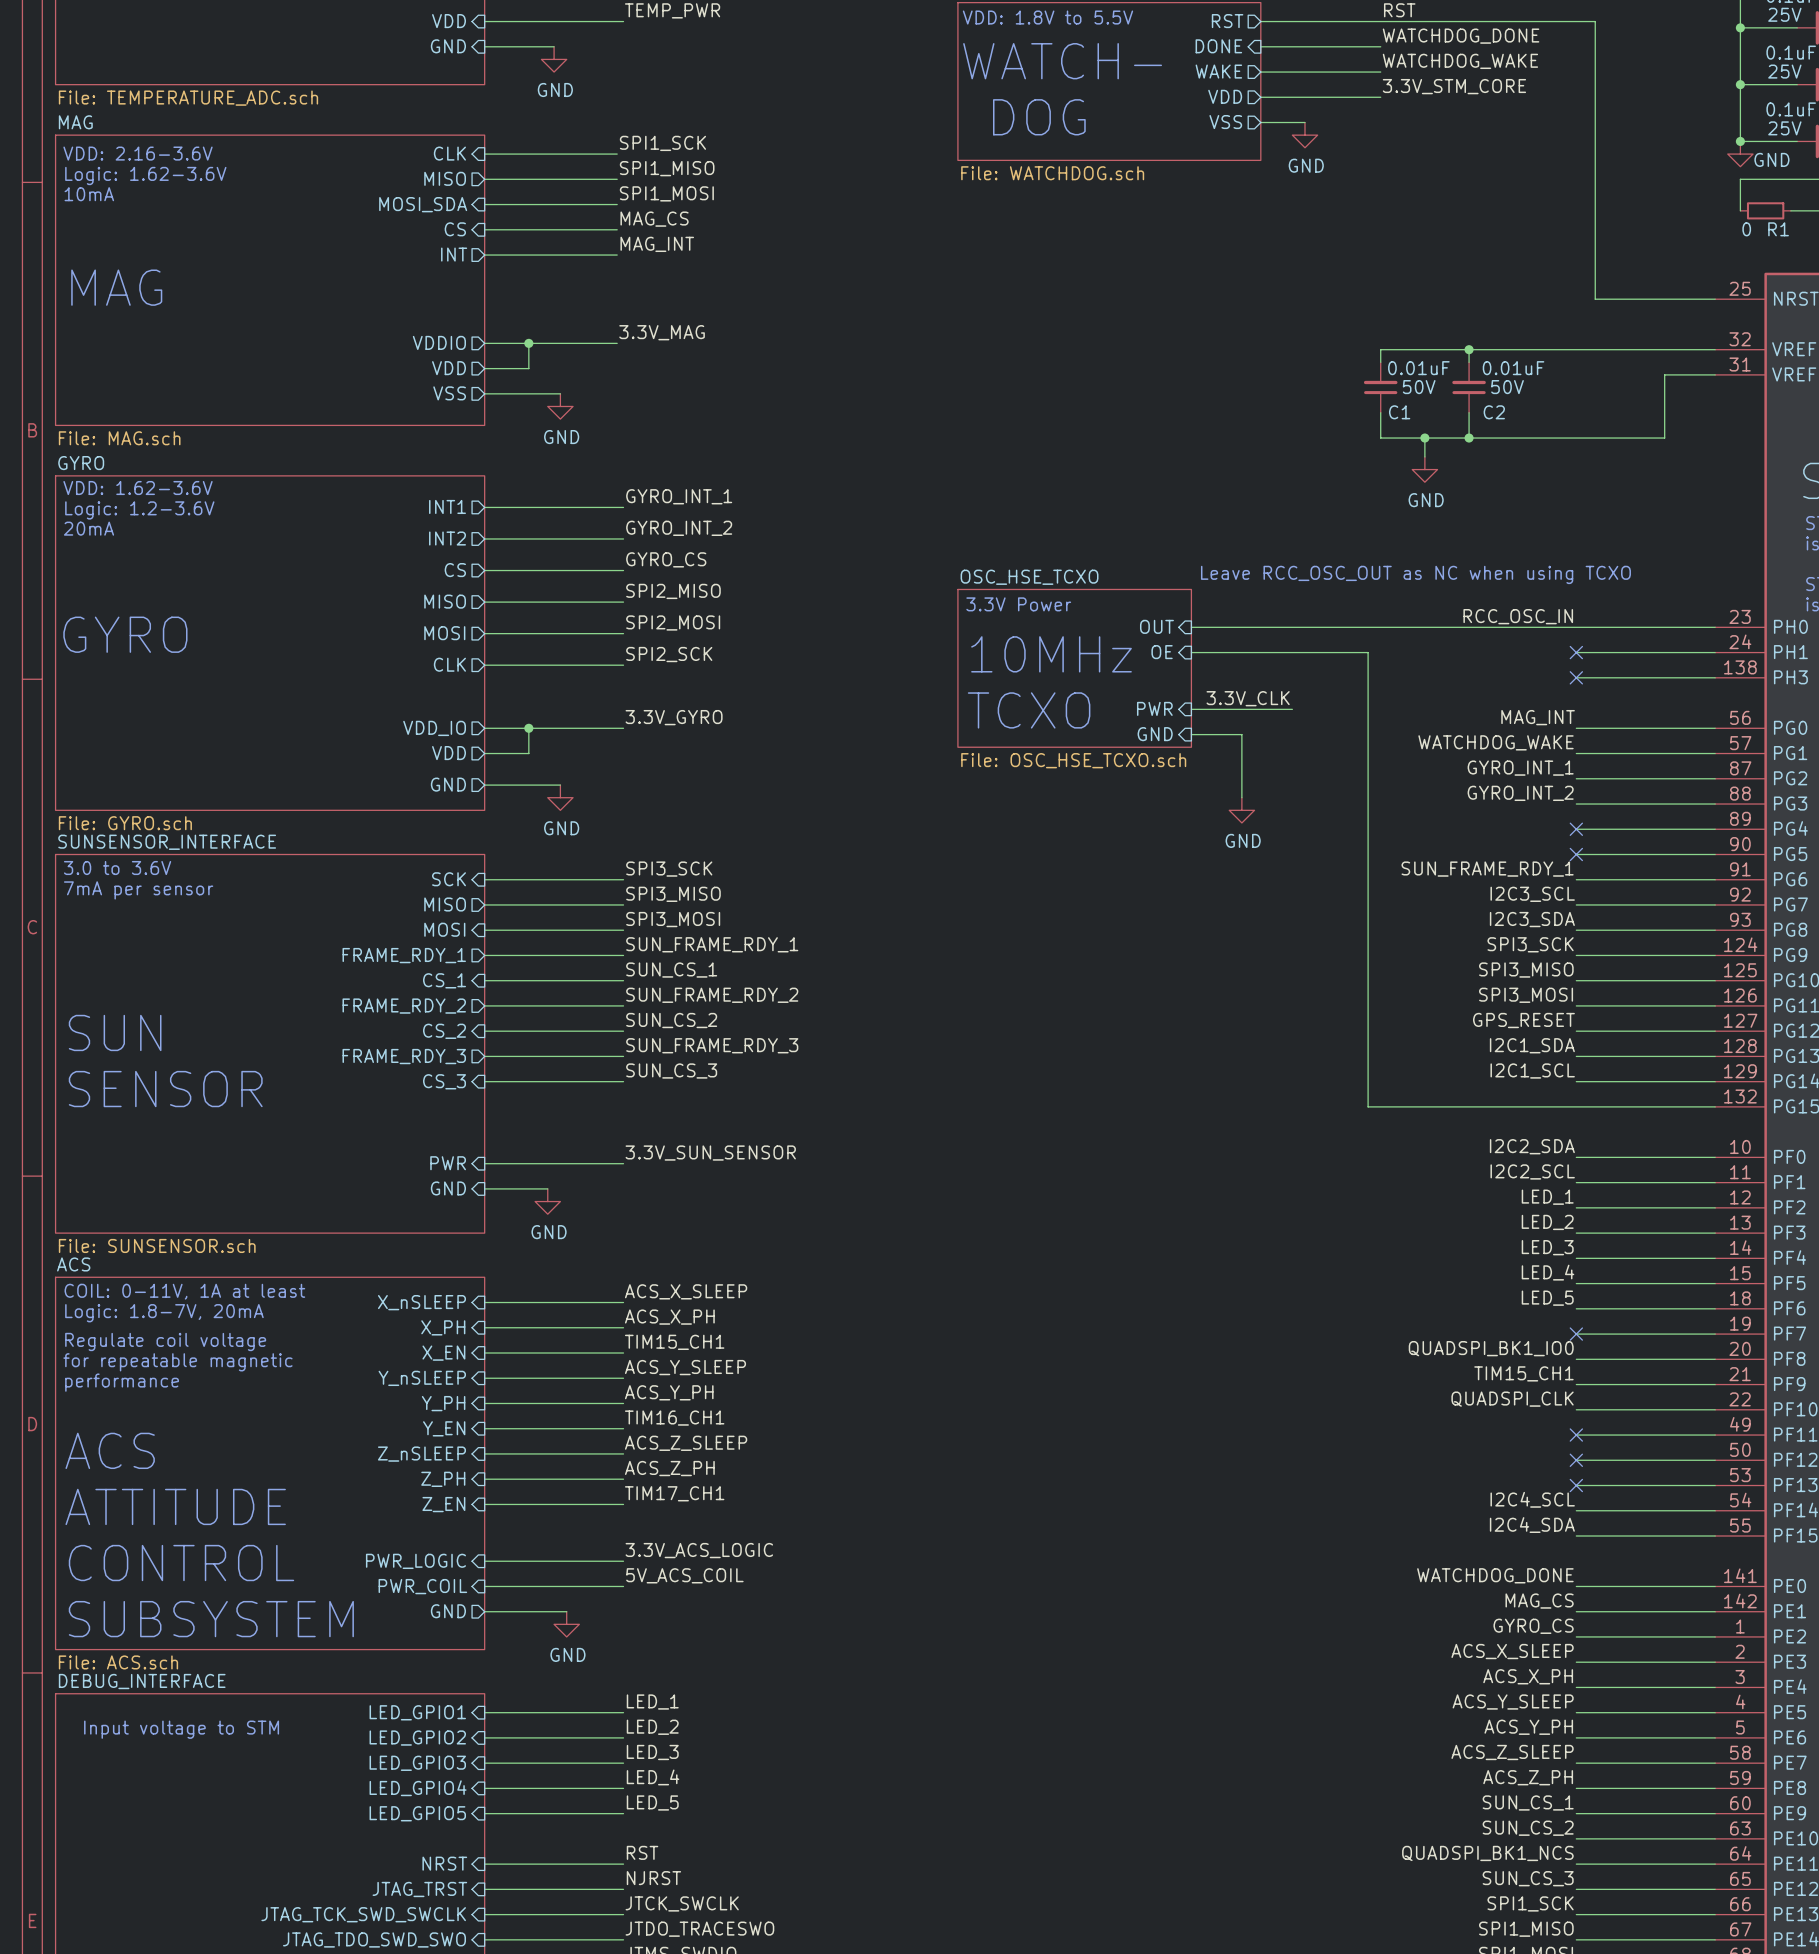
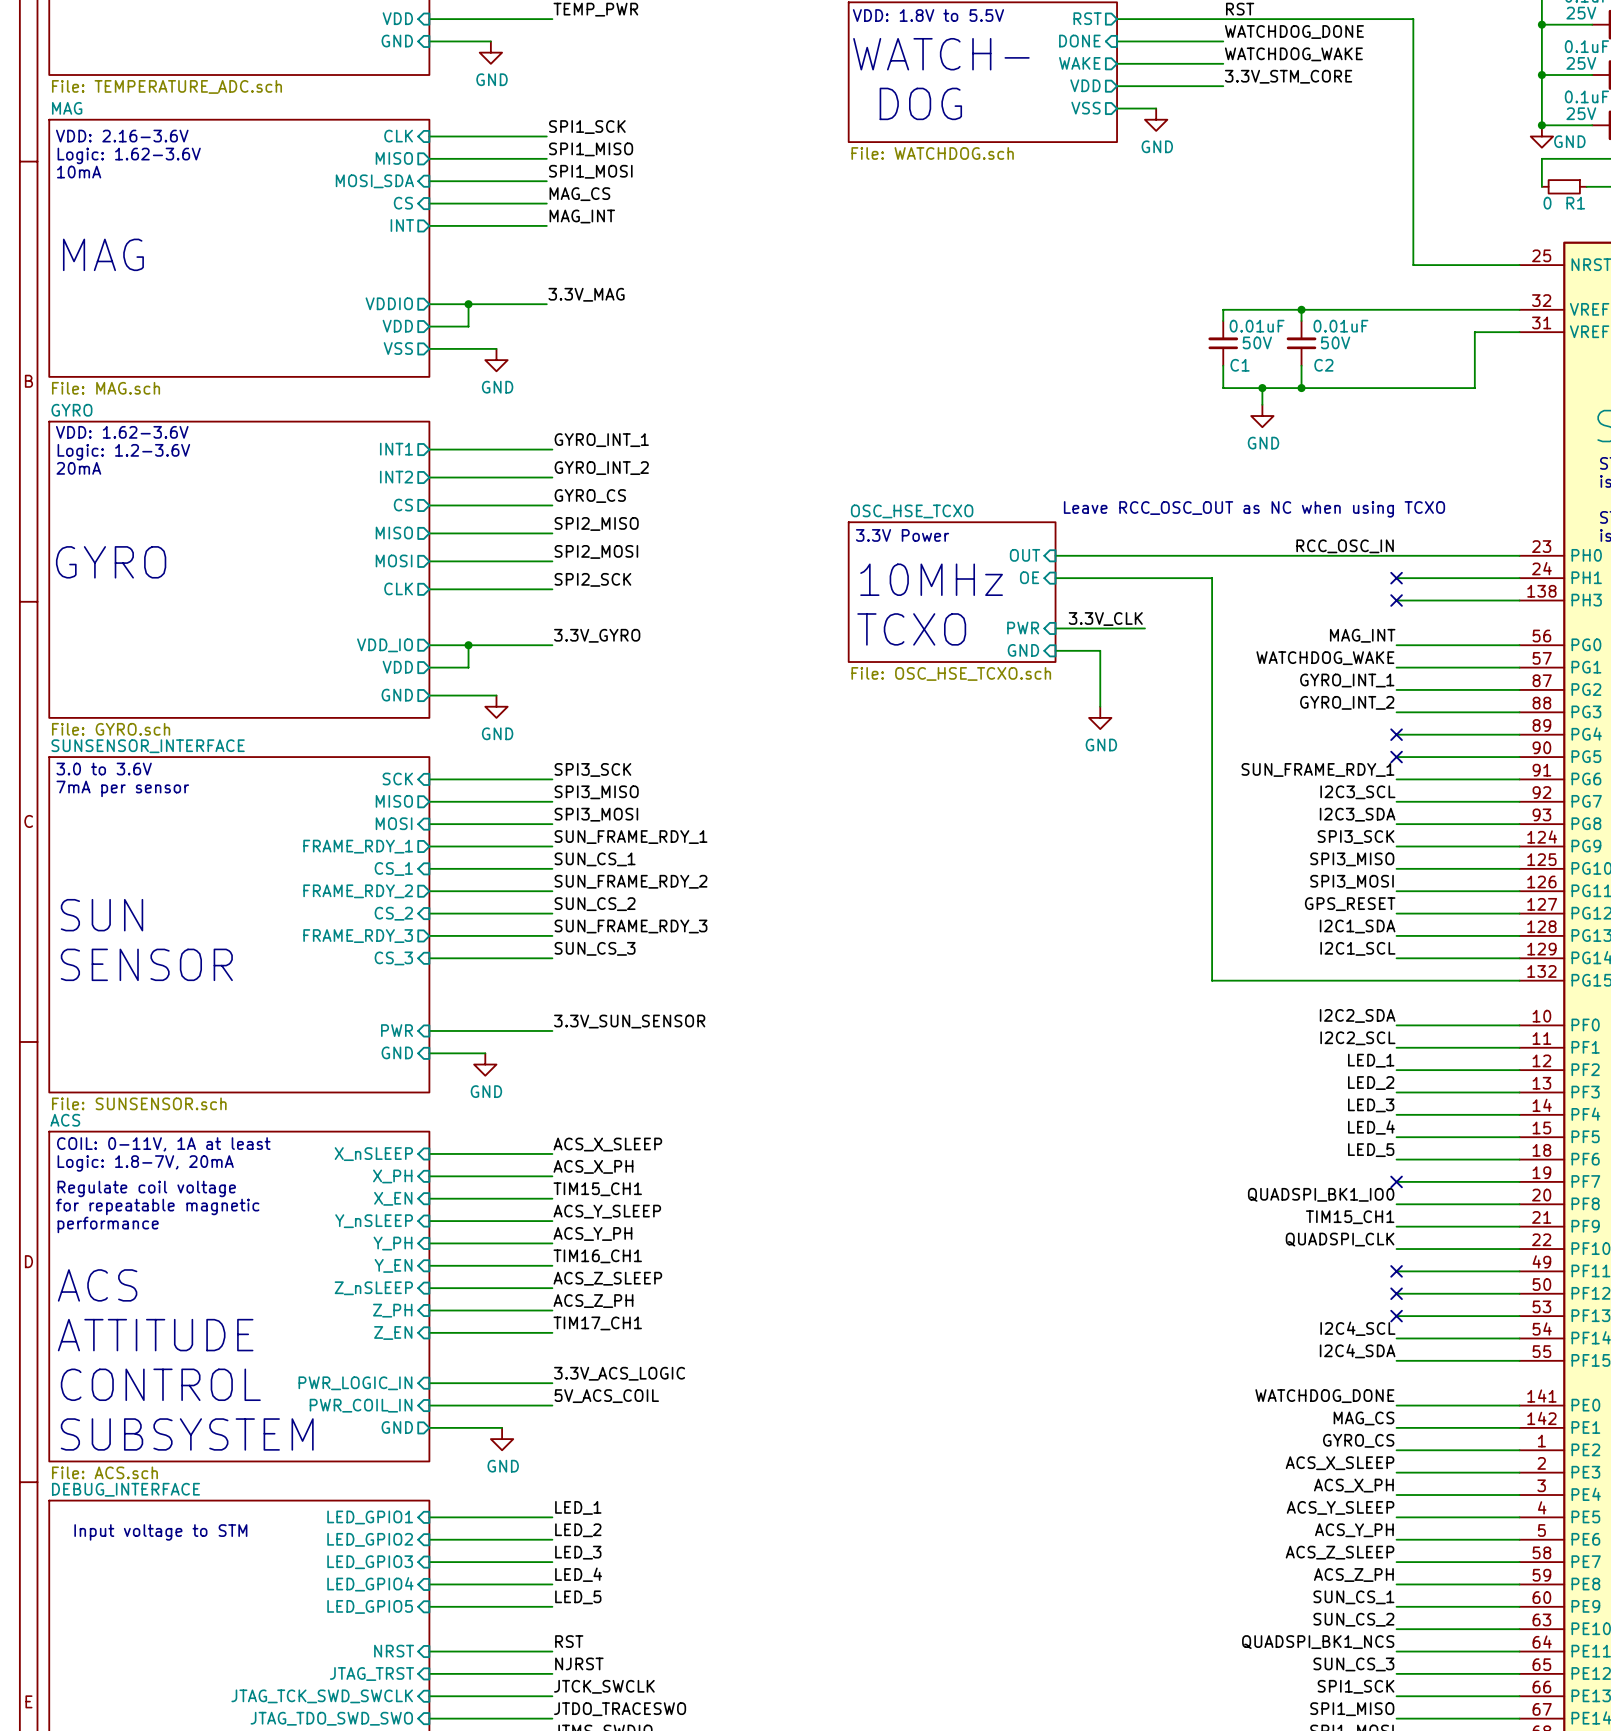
sheet pin: PWR_LOGIC (415, 1561) -> PWR_LOGIC_IN (355, 1383)
sheet pin: PWR_COIL (422, 1586) -> PWR_COIL_IN (361, 1405)

